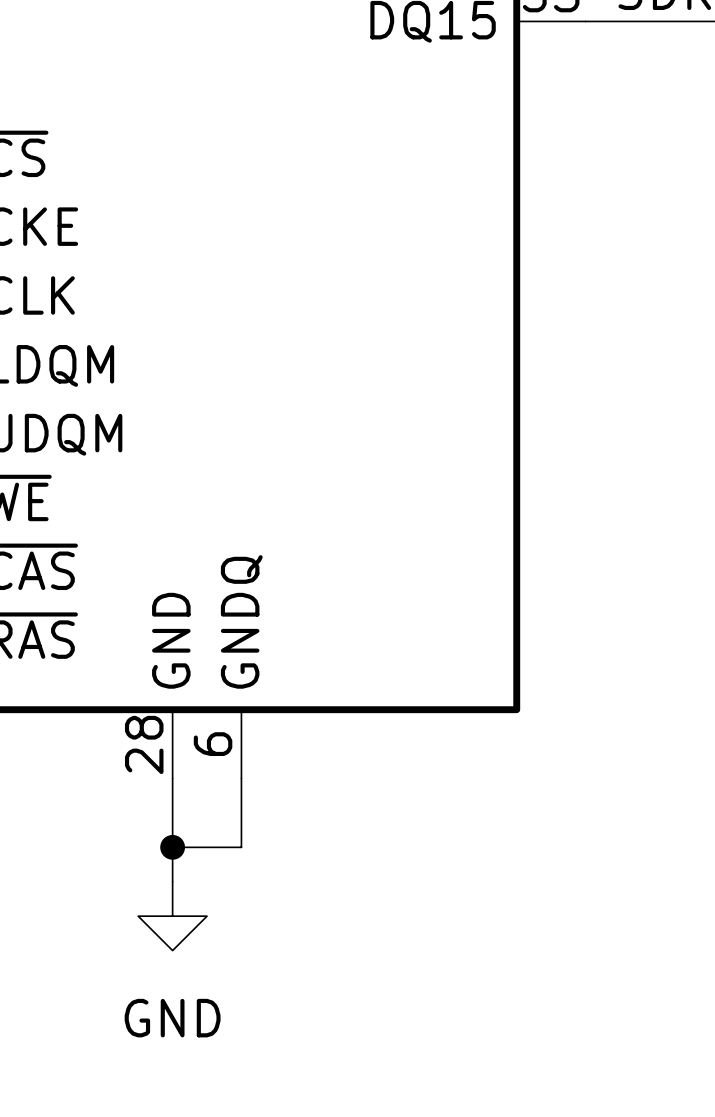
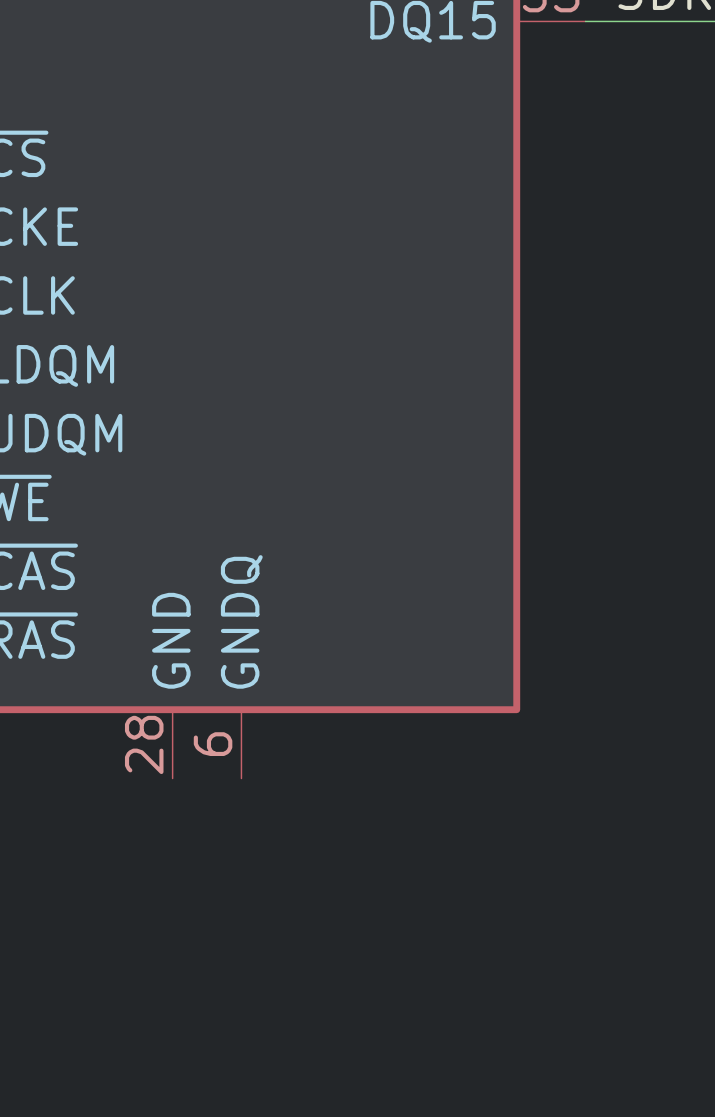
wire: (172, 778) (172, 881) -> none
wire: (241, 778) (241, 847) (172, 847) -> none
junction: (172, 847) -> none
power symbol: GND (172, 916) -> none

